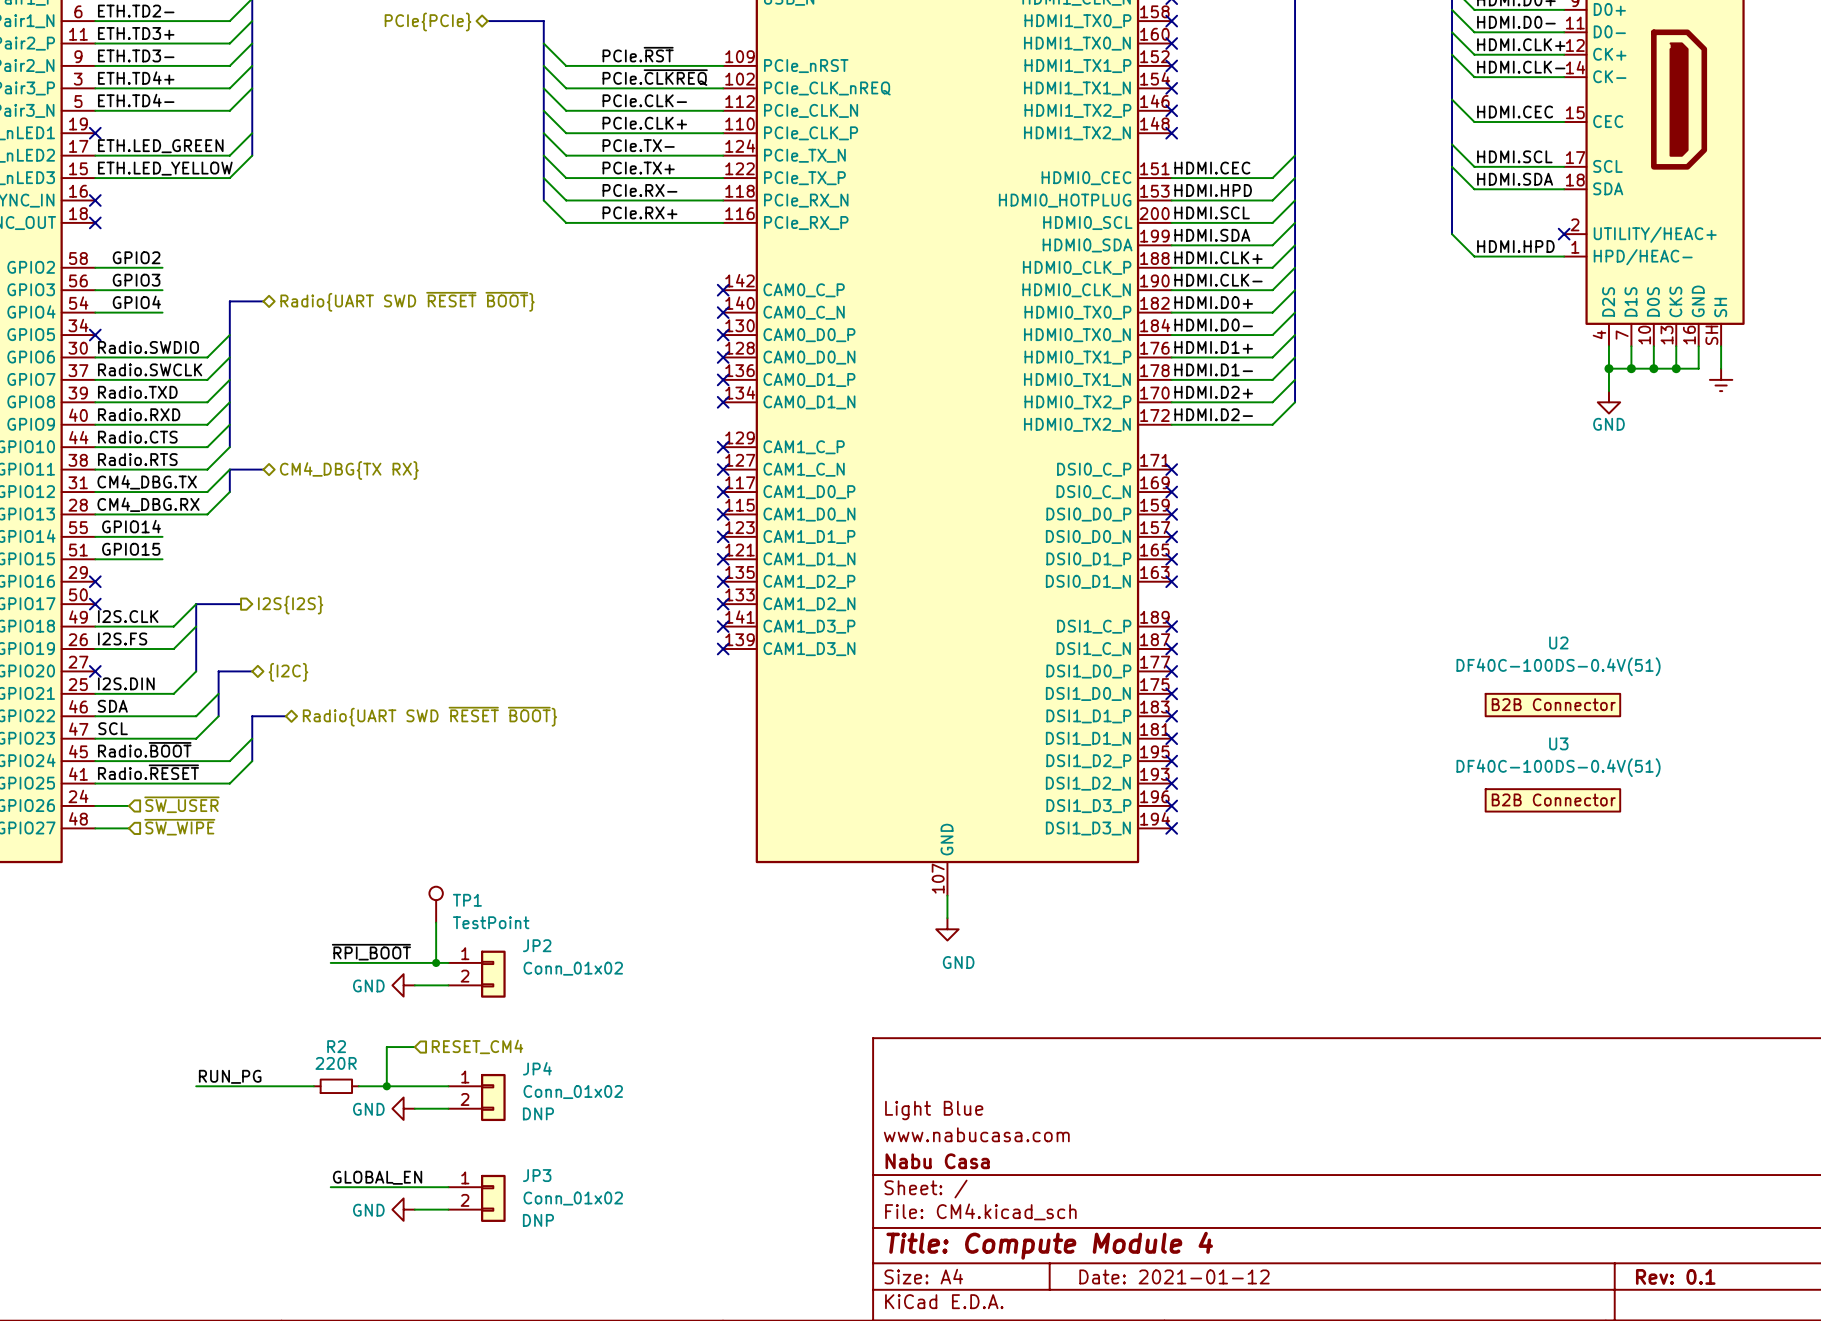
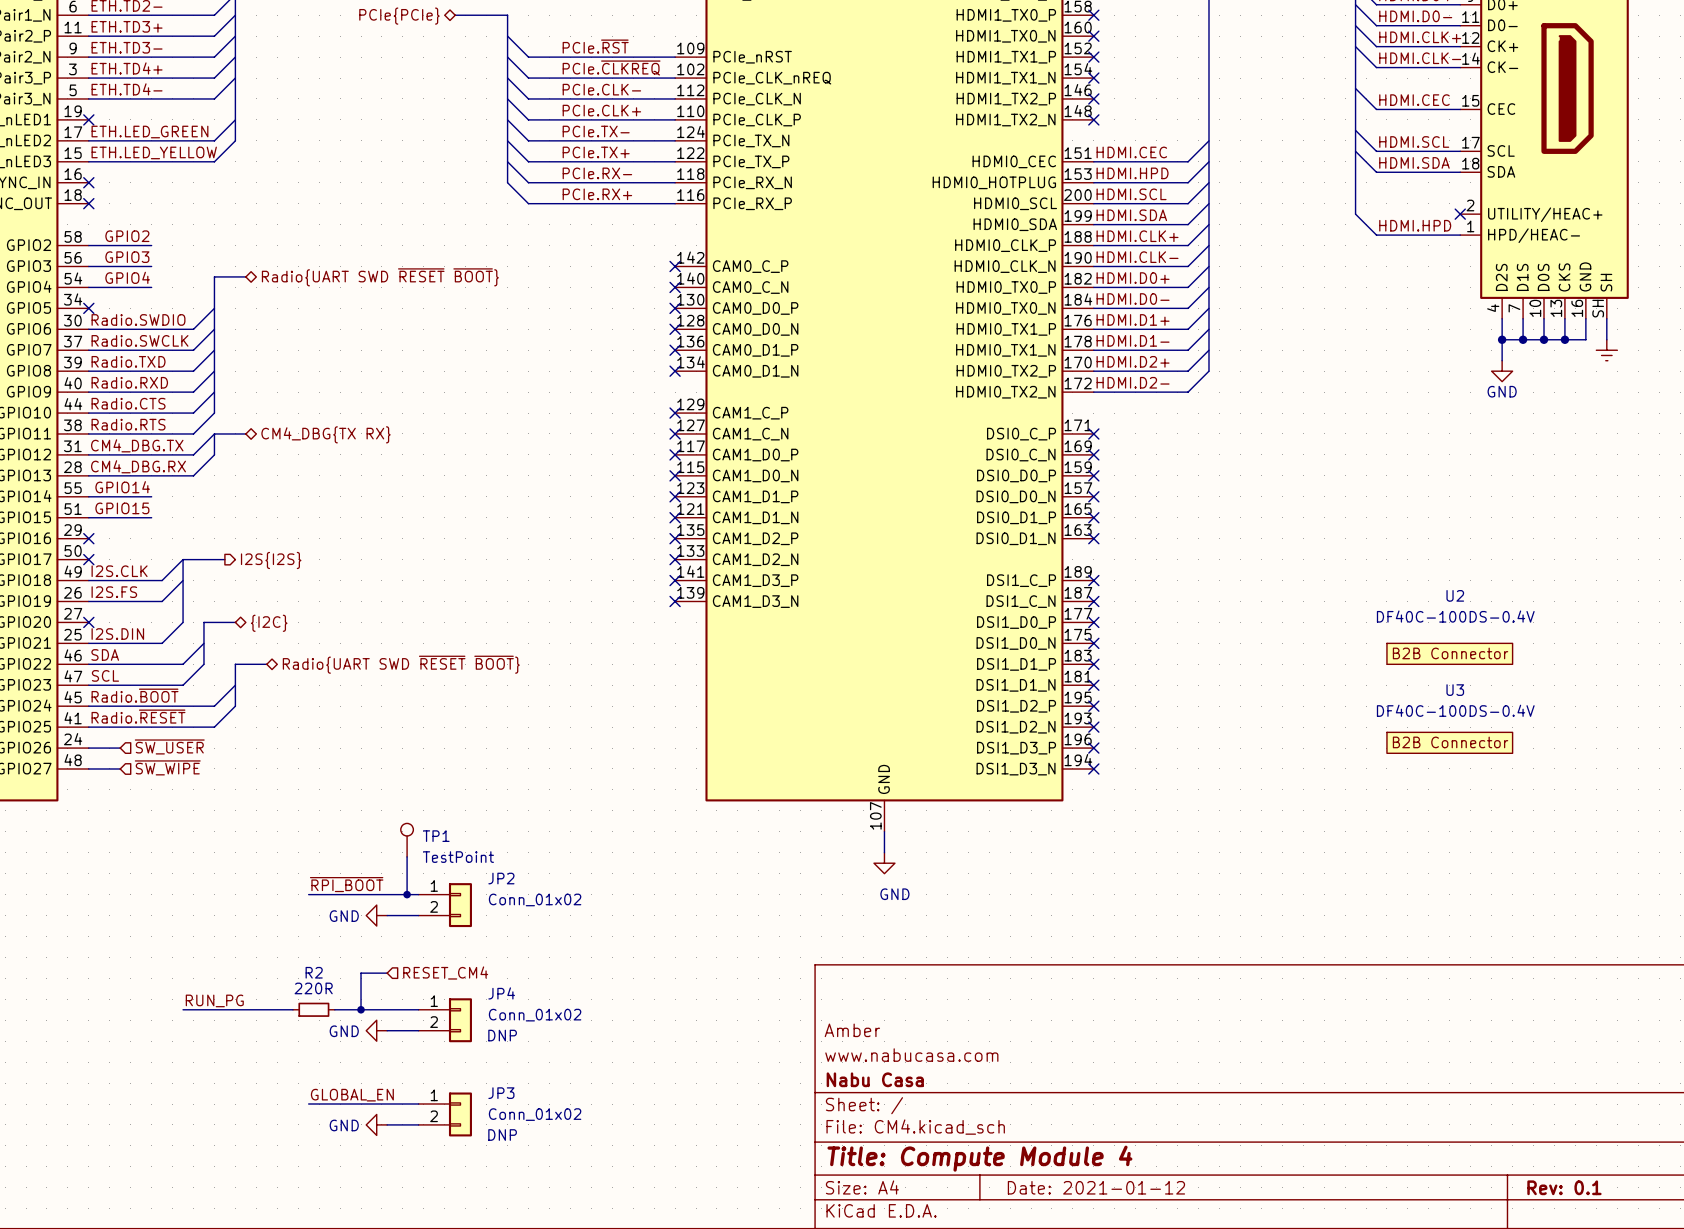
U2 value: DF40C-100DS-0.4V(51) (1558, 666) -> DF40C-100DS-0.4V (1455, 616)
U3 value: DF40C-100DS-0.4V(51) (1558, 767) -> DF40C-100DS-0.4V (1455, 710)
title block: Light Blue (934, 1110) -> Amber (852, 1030)

